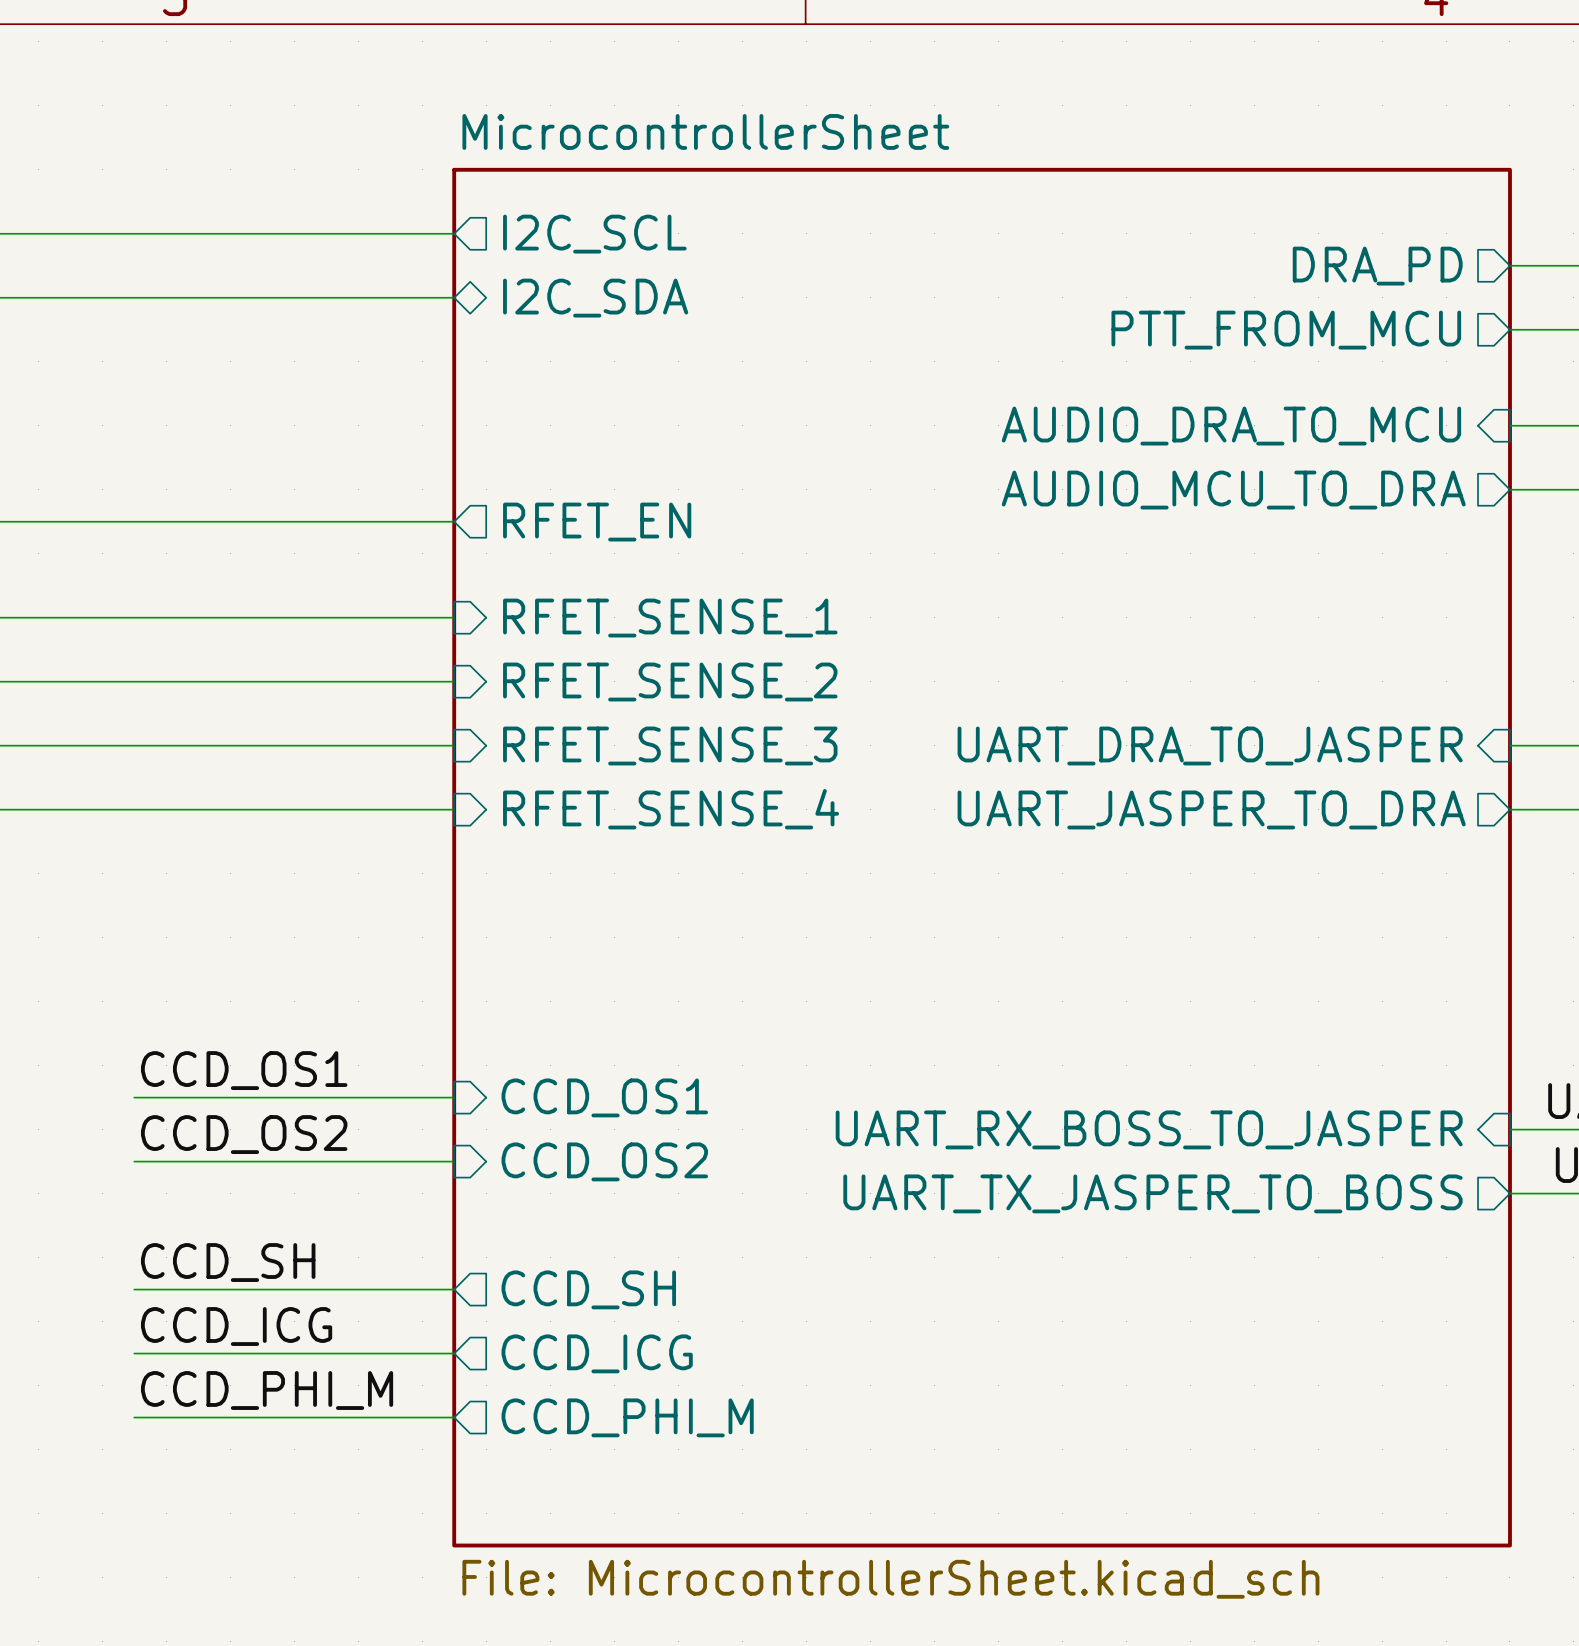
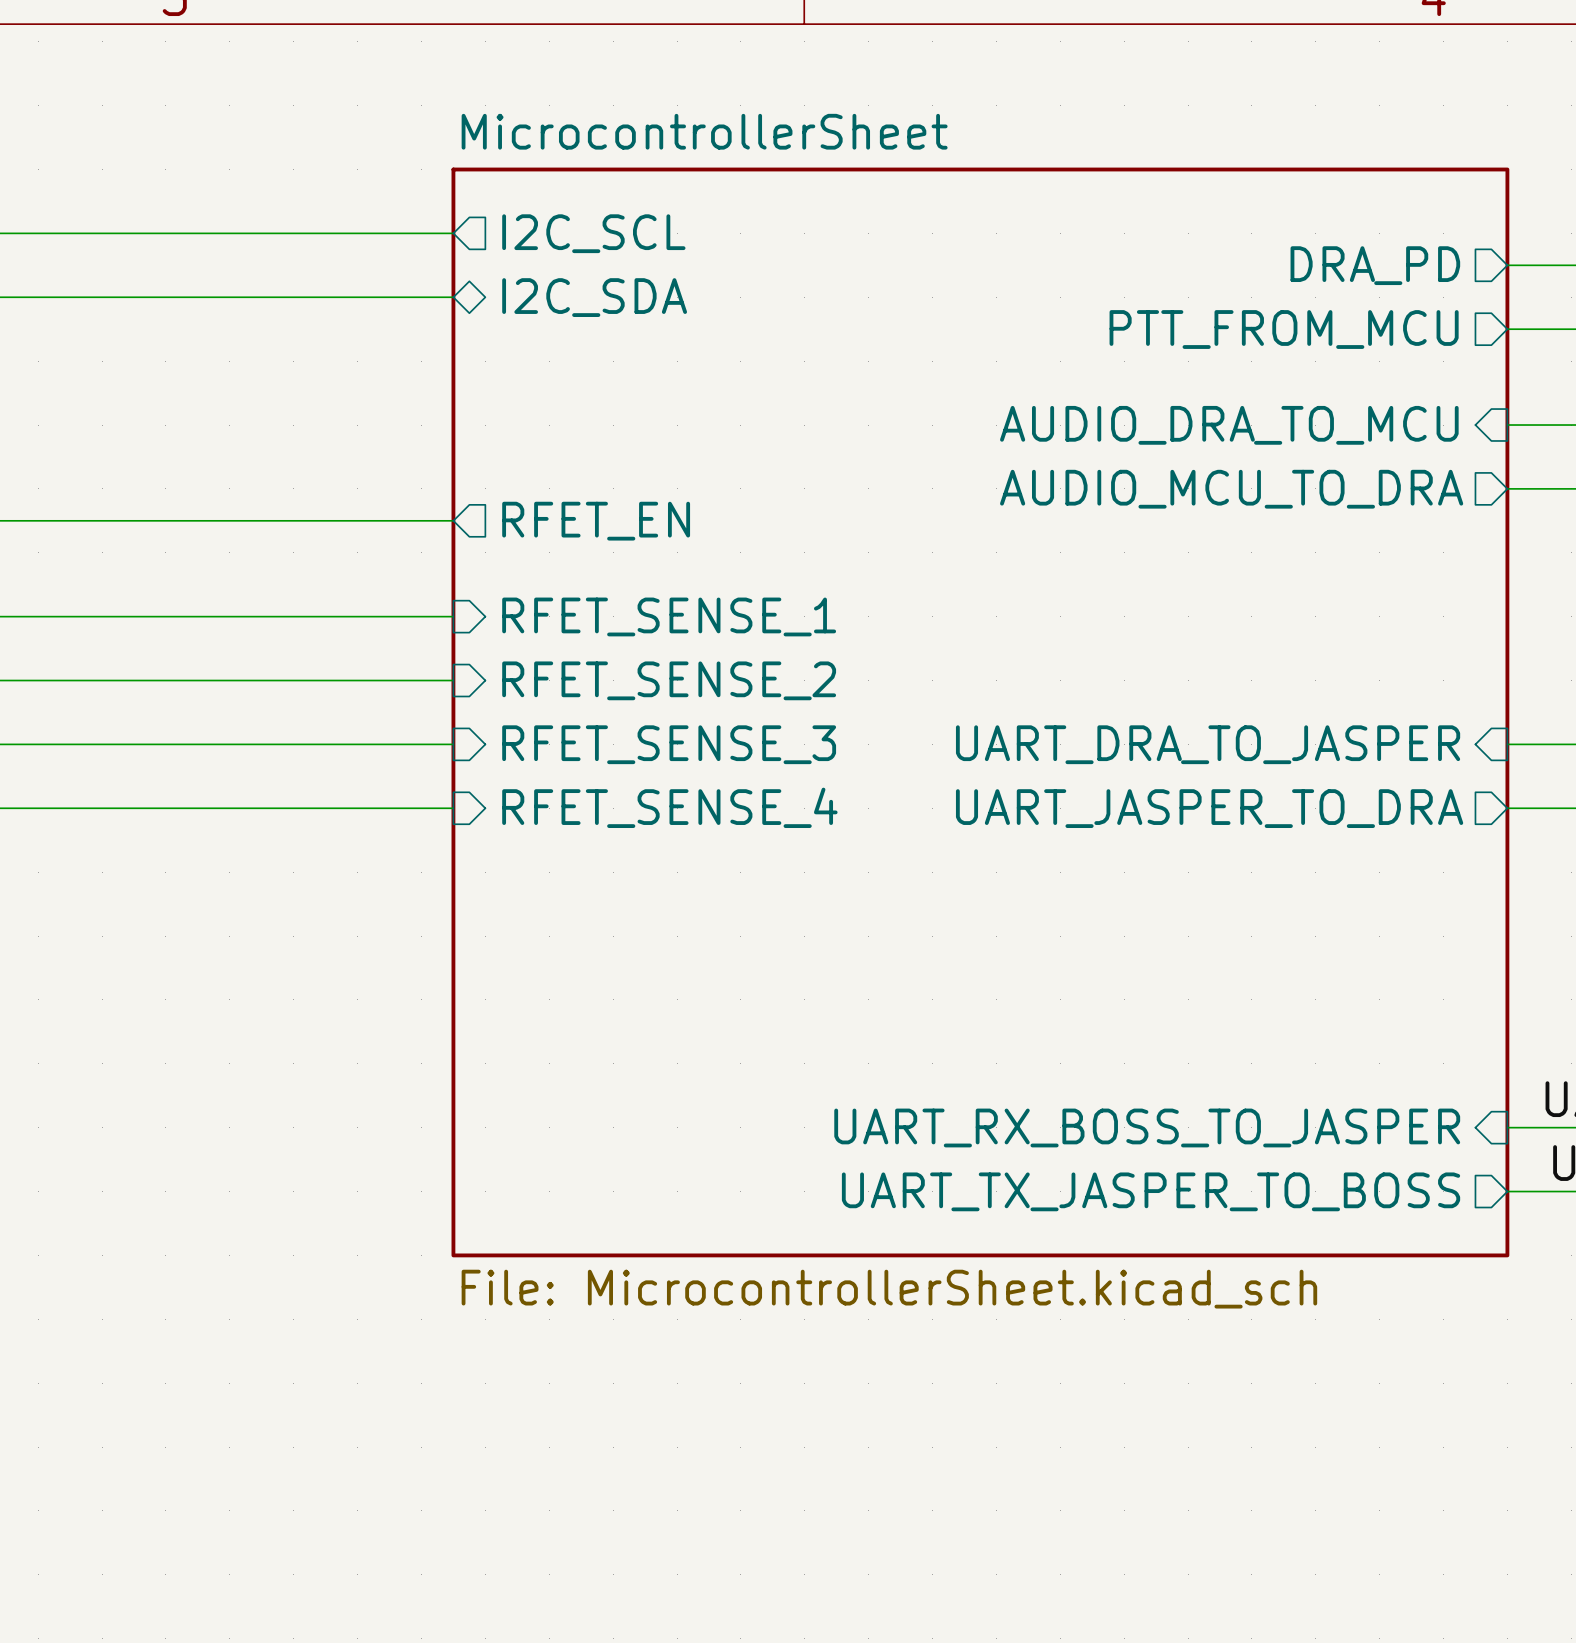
sheet MicrocontrollerSheet: none -> File: MicrocontrollerSheet.kicad_sch (980, 712)
sheet MicrocontrollerSheet: File: MicrocontrollerSheet.kicad_sch (982, 857) -> none
label: CCD_OS1 (244, 1070) -> none
wire: (134, 1097) (454, 1097) -> none
sheet pin: CCD_OS1 (604, 1097) -> none
label: CCD_OS2 (244, 1134) -> none
wire: (134, 1161) (454, 1161) -> none
sheet pin: CCD_OS2 (604, 1161) -> none
label: CCD_SH (228, 1262) -> none
wire: (134, 1289) (454, 1289) -> none
sheet pin: CCD_SH (588, 1289) -> none
label: CCD_ICG (236, 1326) -> none
wire: (134, 1353) (454, 1353) -> none
sheet pin: CCD_ICG (597, 1353) -> none
label: CCD_PHI_M (267, 1390) -> none
wire: (134, 1417) (454, 1417) -> none
sheet pin: CCD_PHI_M (627, 1417) -> none

